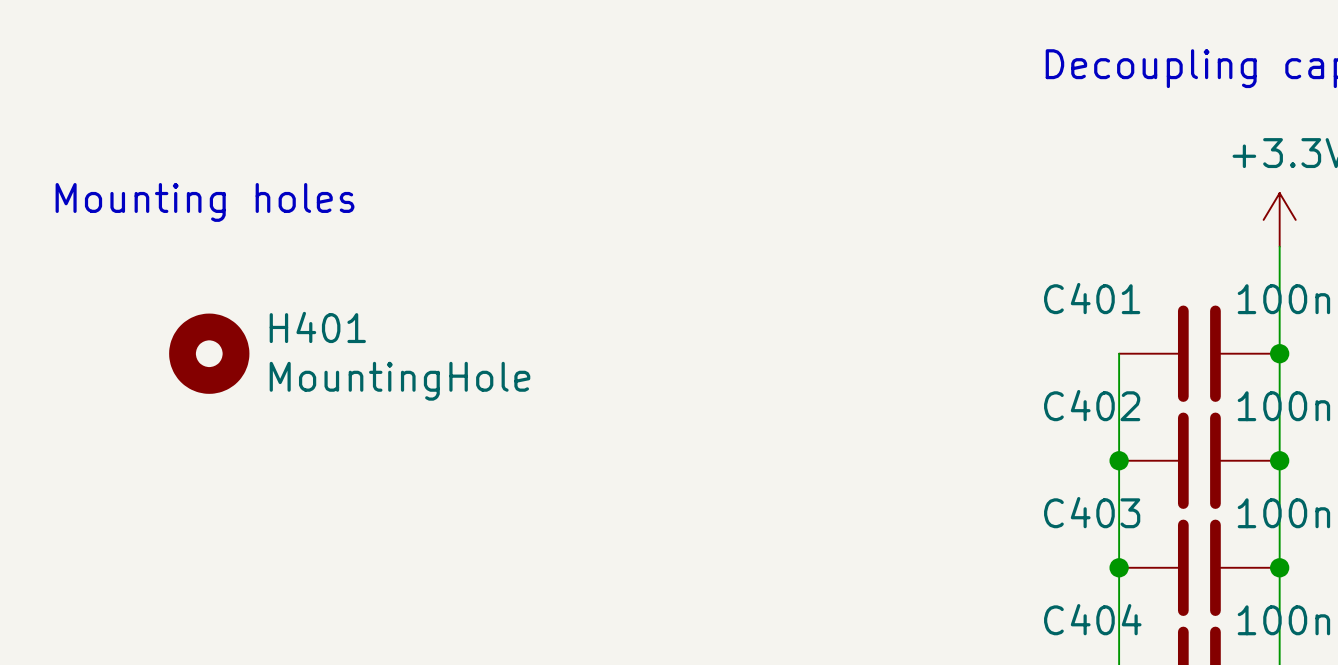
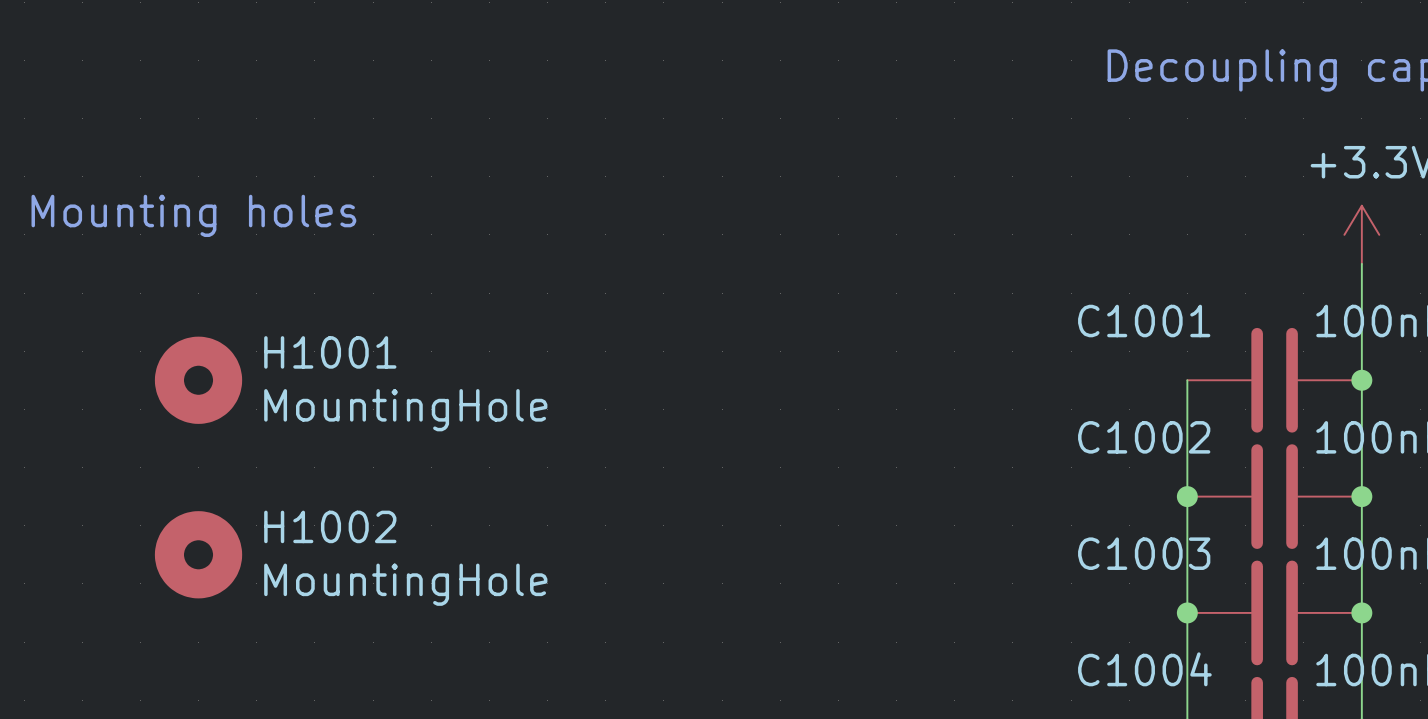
C401 name: C401 (1092, 298) -> C1001 (1144, 321)
H401 name: H401 (317, 327) -> H1001 (330, 352)
C402 name: C402 (1092, 405) -> C1002 (1144, 437)
C403 name: C403 (1092, 512) -> C1003 (1144, 553)
H1002: none -> MountingHole (198, 554)
C404 name: C404 (1092, 619) -> C1004 (1144, 669)

